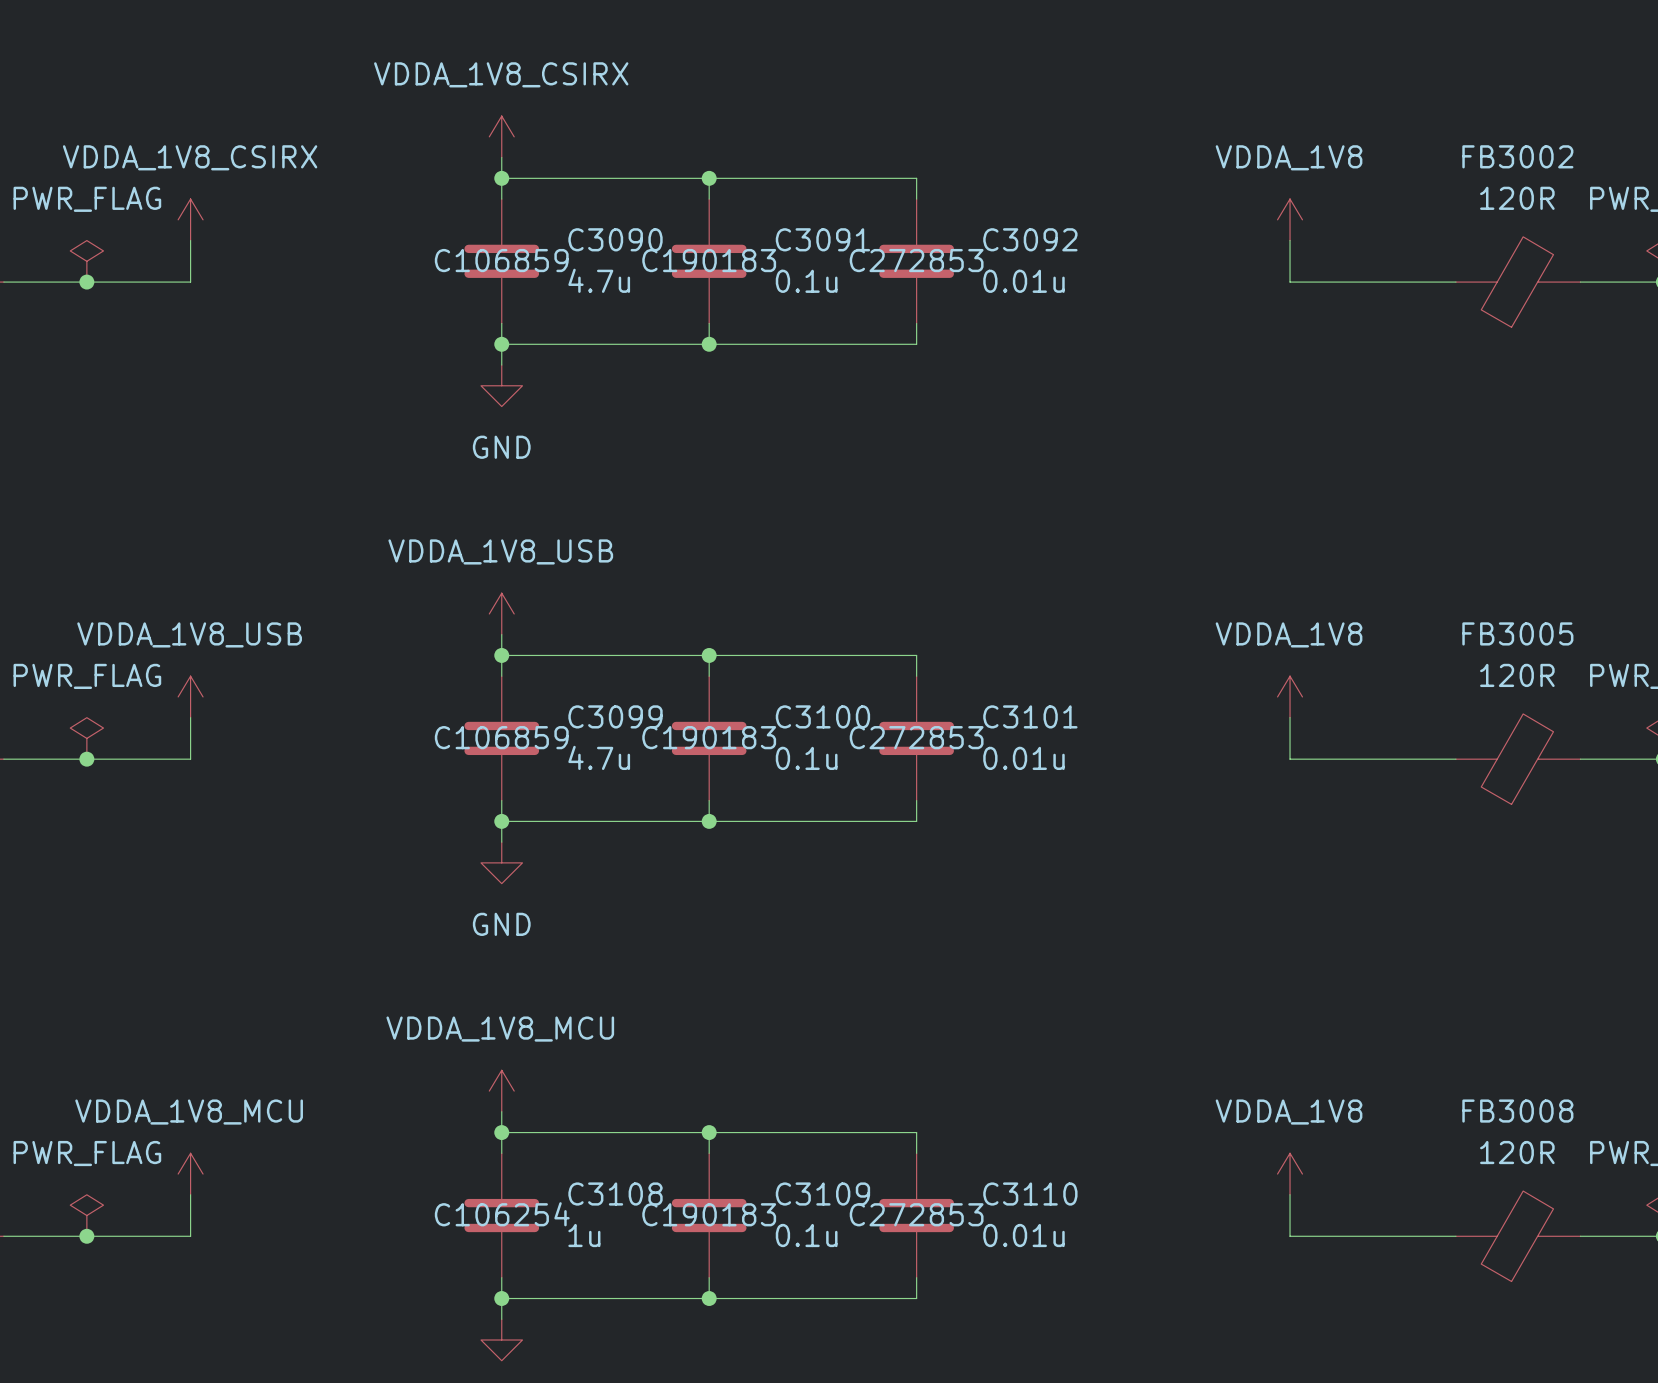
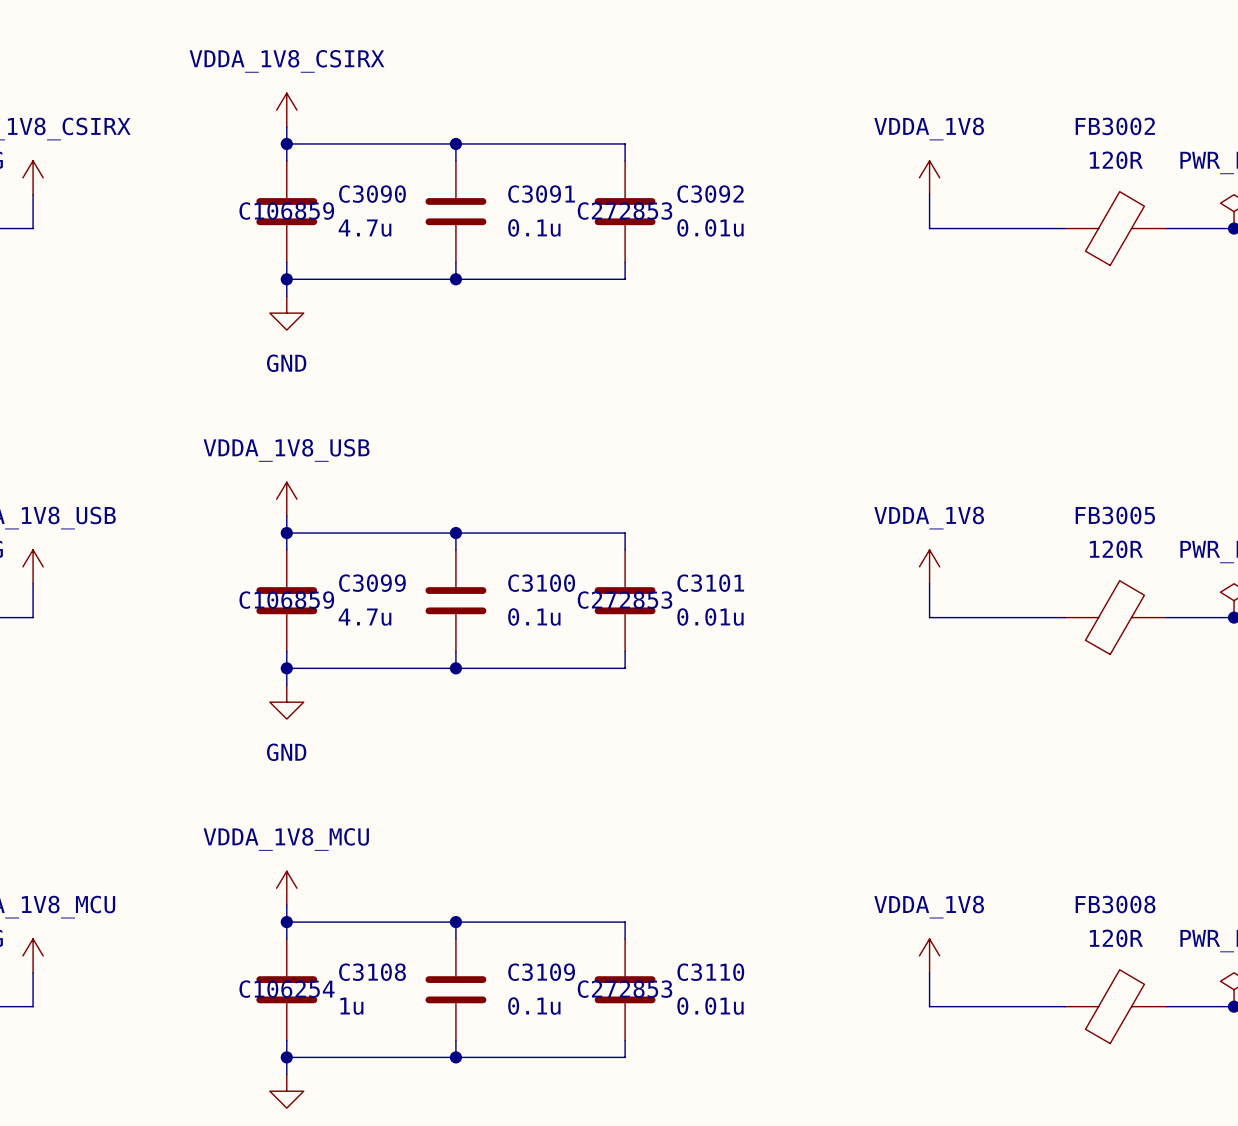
C3091 text: C190183 (709, 260) -> none
C3100 text: C190183 (709, 737) -> none
C3109 text: C190183 (709, 1214) -> none

